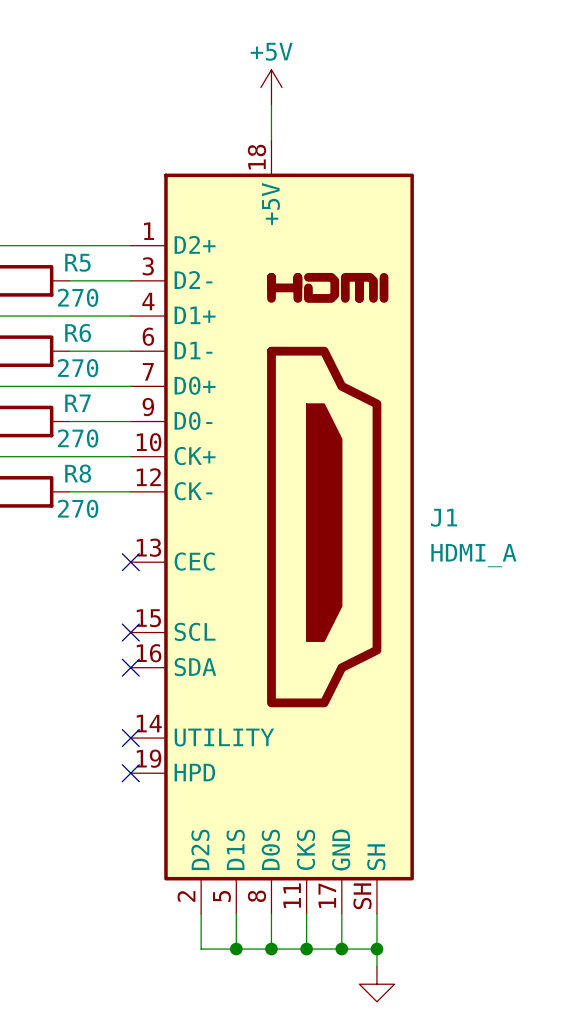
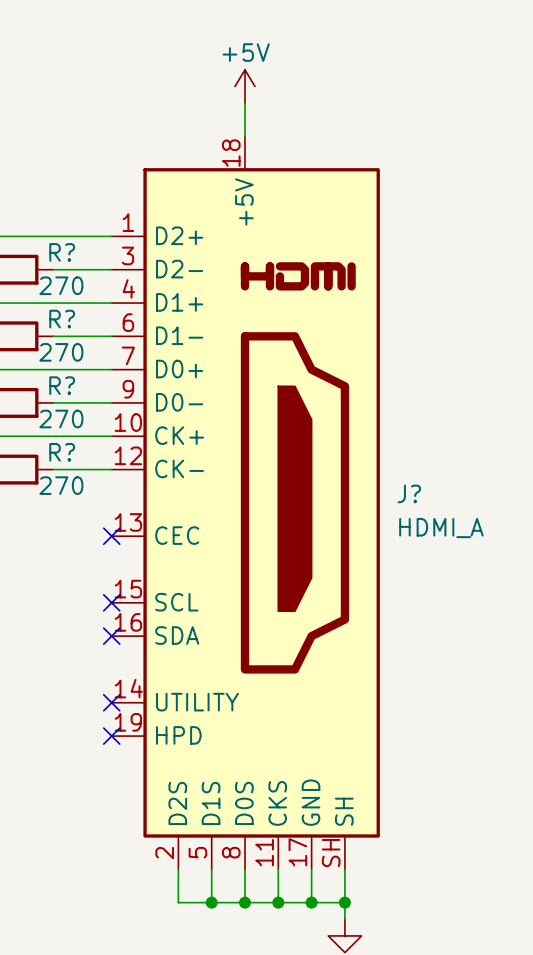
R5 name: R5 (77, 262) -> R? (62, 252)
R6 name: R6 (78, 332) -> R? (62, 319)
R7 name: R7 (77, 403) -> R? (62, 385)
R8 name: R8 (78, 473) -> R? (62, 452)
J1 name: J1 (444, 517) -> J? (409, 493)

